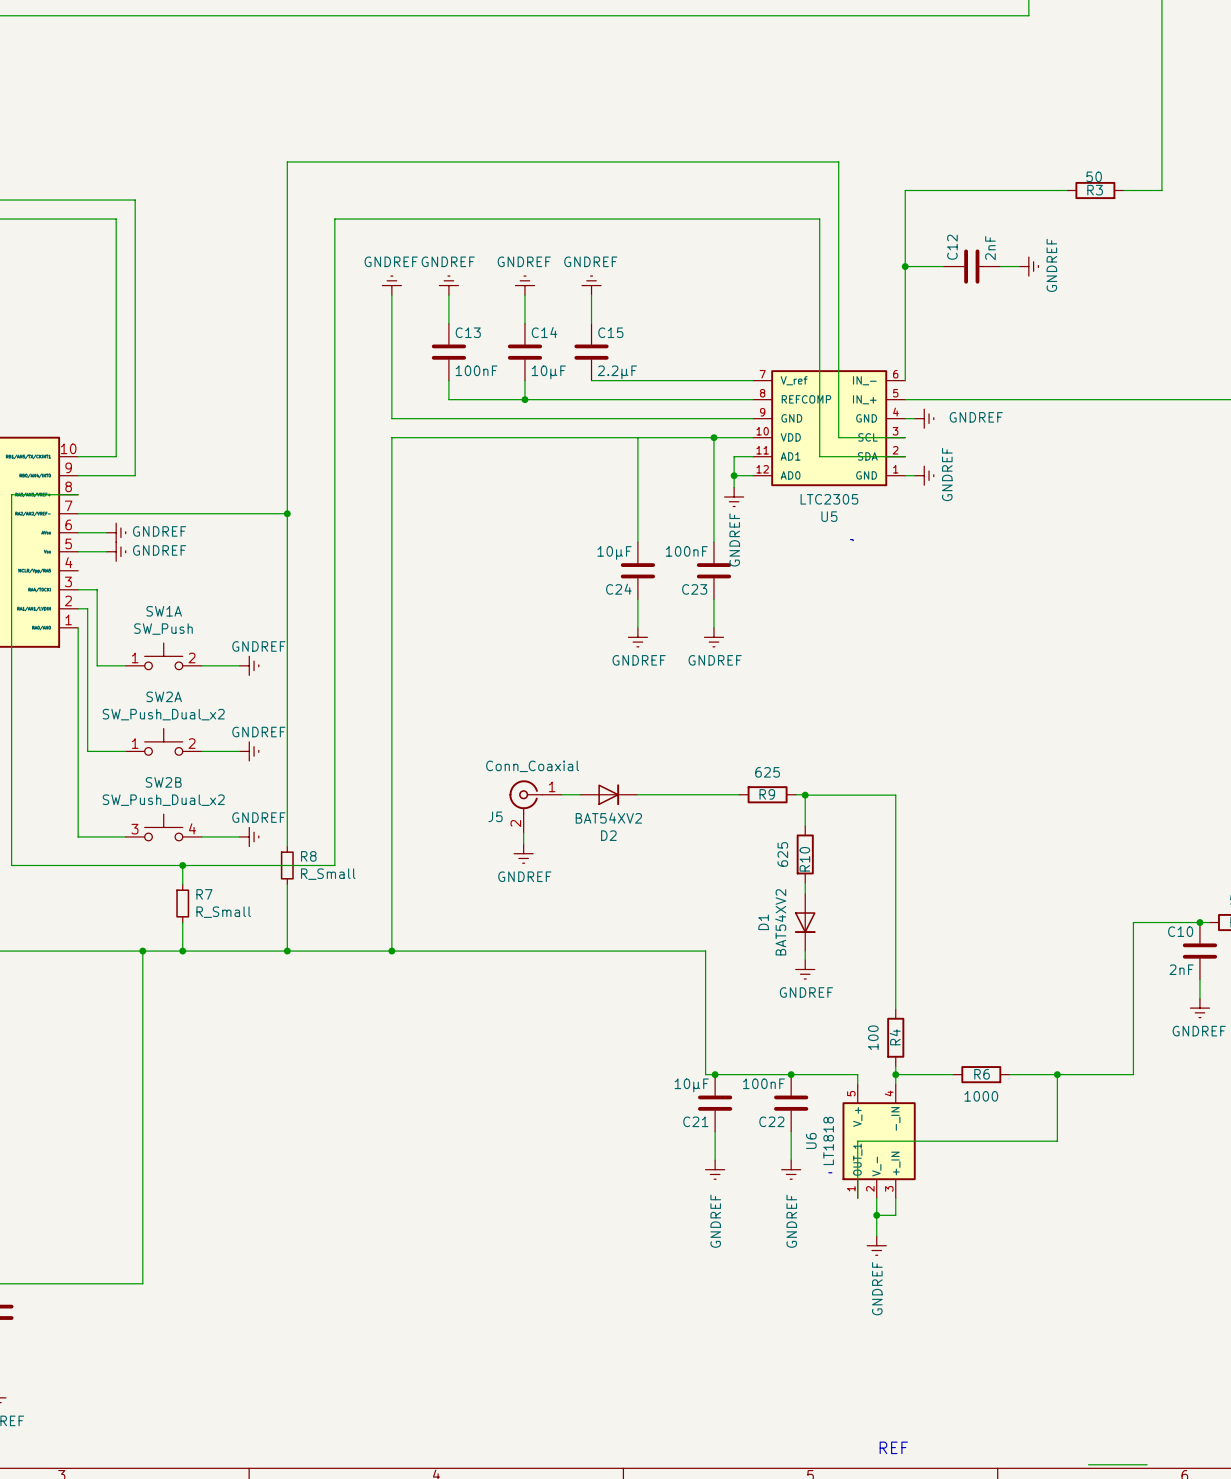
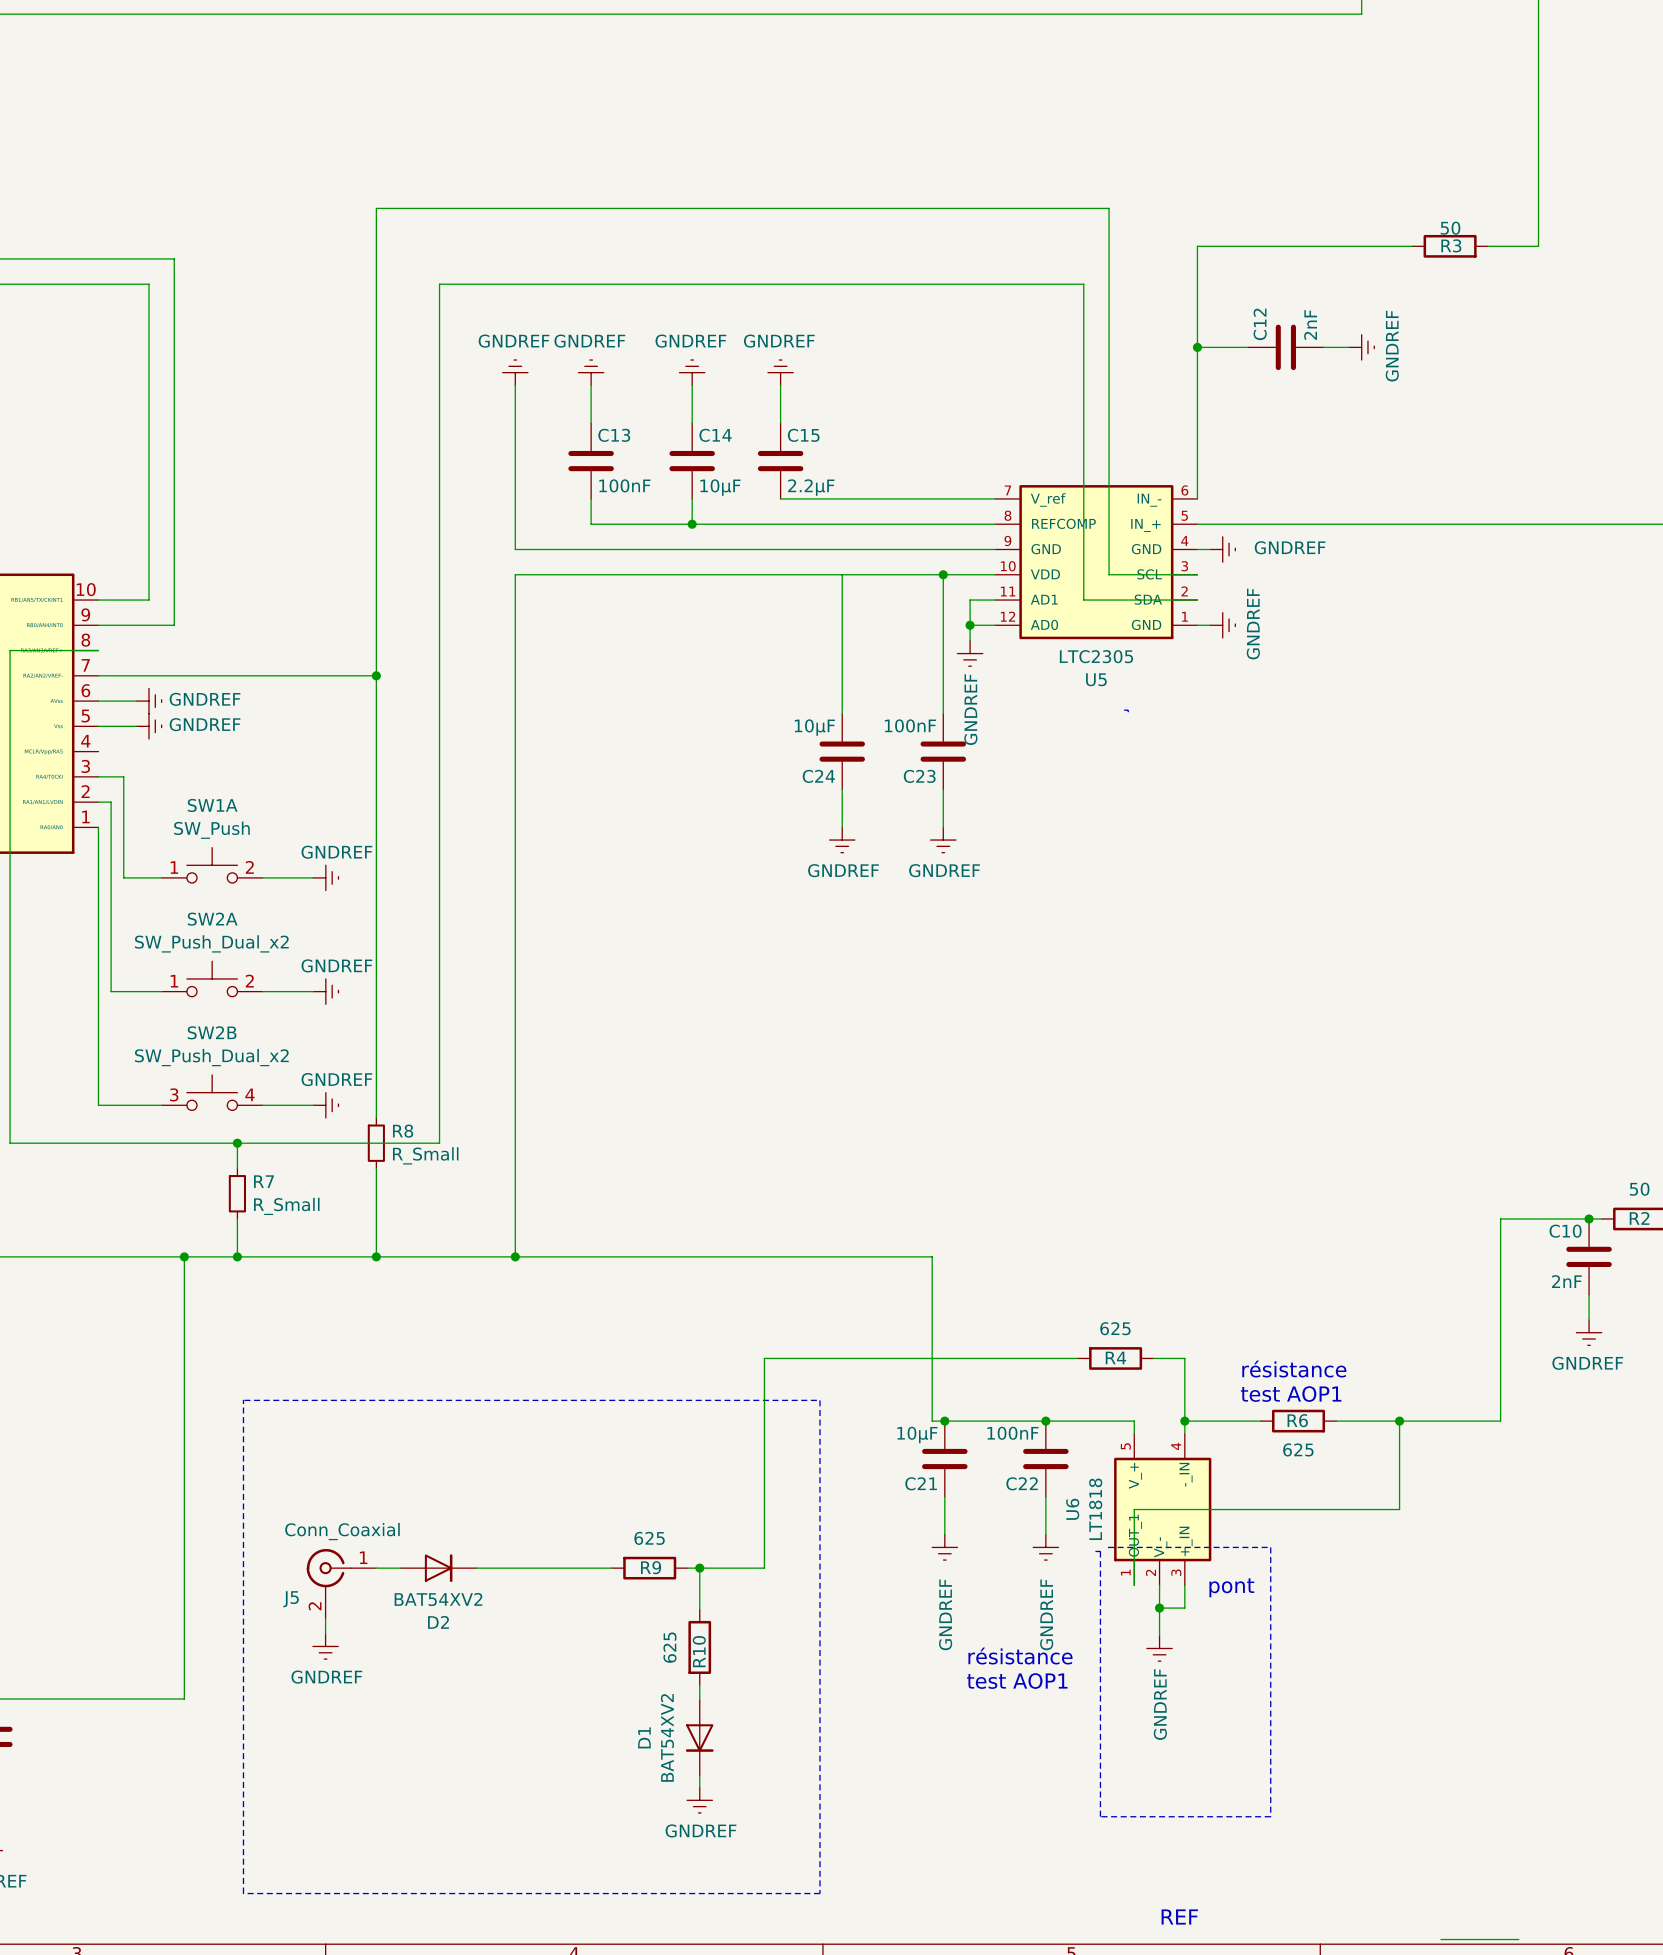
wire: (561, 794) (580, 794) -> none
D2 position: (608, 794) -> (438, 1568)
wire: (637, 794) (739, 794) -> none
R9 position: (767, 794) -> (649, 1568)
wire: (796, 794) (805, 794) (805, 825) -> none
wire: (805, 795) (895, 795) (895, 1009) -> none
junction: (805, 795) -> none
J5 position: (535, 806) -> (341, 1583)
wire: (523, 832) (523, 844) -> none
power symbol: GNDREF (523, 853) -> none
R10 position: (805, 854) -> (699, 1647)
wire: (805, 882) (805, 894) -> none
D1 position: (805, 922) -> (699, 1737)
wire: (805, 951) (805, 959) -> none
power symbol: GNDREF (805, 969) -> none
wire: none -> (1077, 1358) (764, 1358) (764, 1568) (687, 1568)
wire: none -> (1153, 1358) (1184, 1358) (1184, 1409)
text: none -> résistance (1294, 1369)
R4 value: 100 (873, 1037) -> 625 (1115, 1328)
R4 rotation: 0° (895, 1037) -> 90° clockwise (1115, 1358)
R4 position: (895, 1037) -> (1115, 1358)
text: none -> test AOP1 (1291, 1394)
line: none -> (243, 1399) (243, 1893) (820, 1893) (820, 1400) (244, 1400)
R6 value: 1000 (981, 1096) -> 625 (1298, 1449)
line: none -> (1108, 1547) (1270, 1547) (1270, 1816) (1100, 1816) (1100, 1551)
wire: none -> (376, 1568) (400, 1568)
wire: none -> (476, 1568) (611, 1568)
wire: none -> (699, 1568) (699, 1609)
junction: none -> (699, 1568)
text: none -> pont (1231, 1587)
wire: none -> (325, 1618) (325, 1633)
power symbol: none -> GNDREF (325, 1646)
text: none -> résistance (1020, 1656)
text: none -> test AOP1 (1017, 1681)
wire: none -> (699, 1685) (699, 1700)
wire: none -> (699, 1775) (699, 1787)
power symbol: none -> GNDREF (699, 1800)

